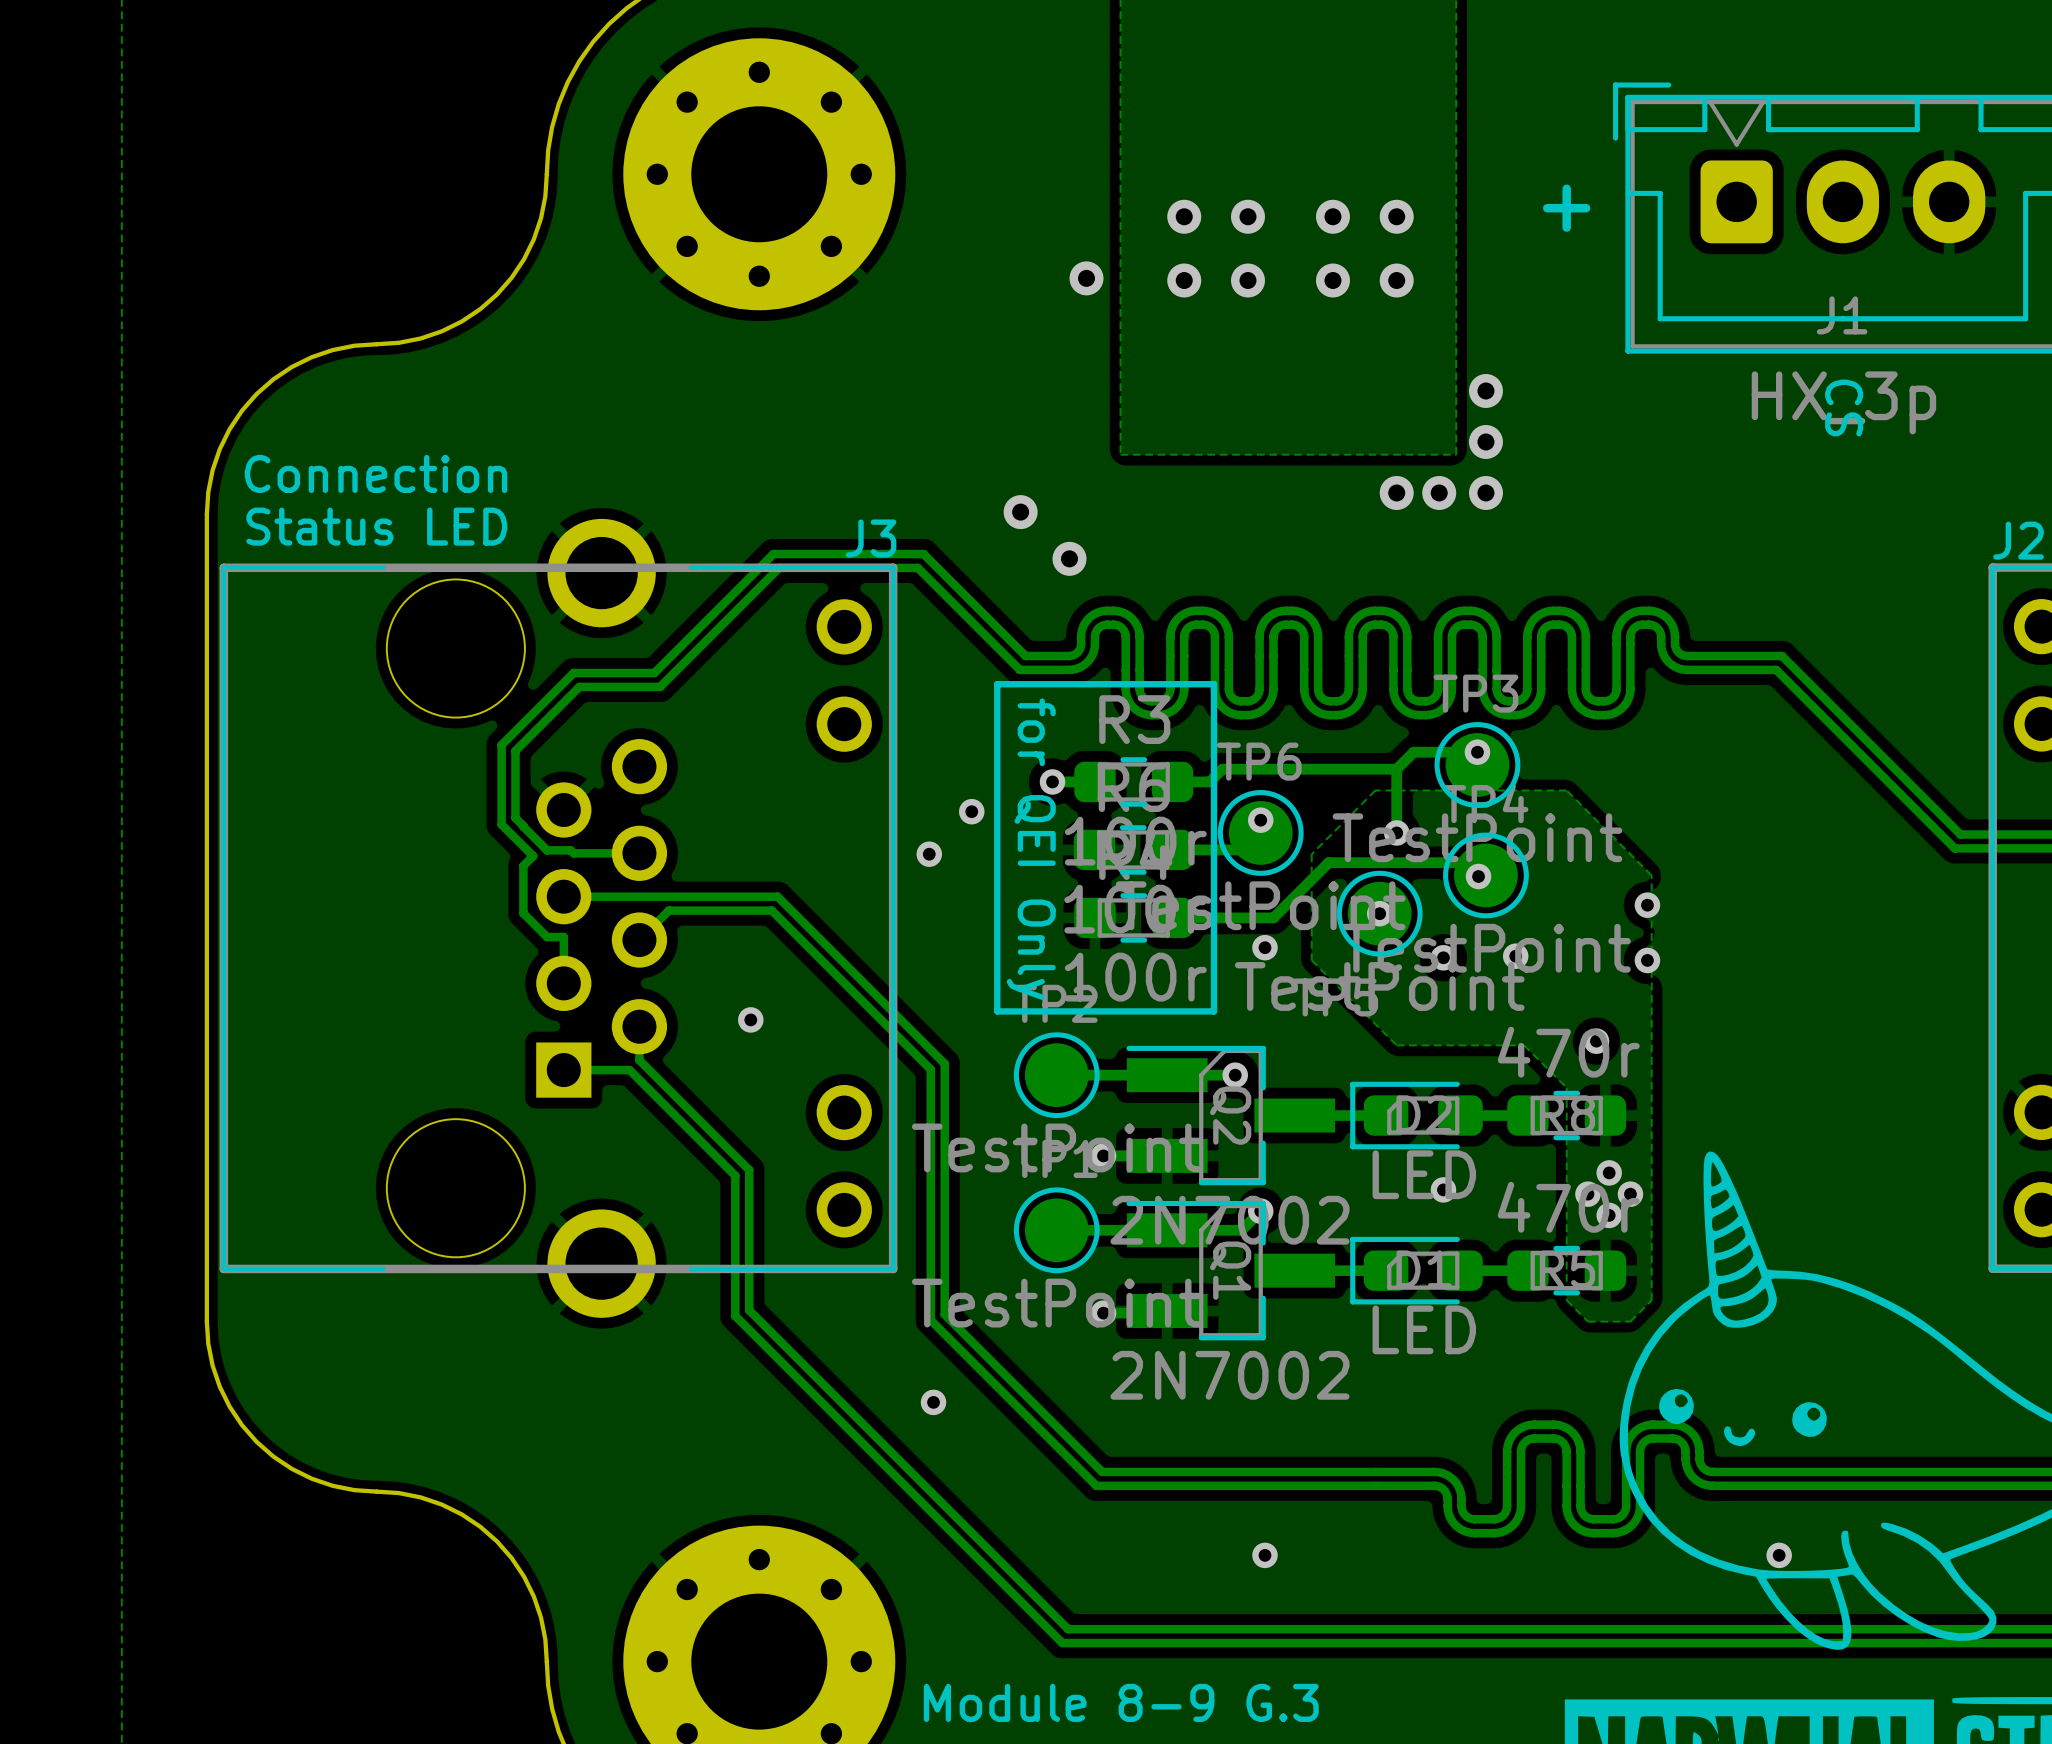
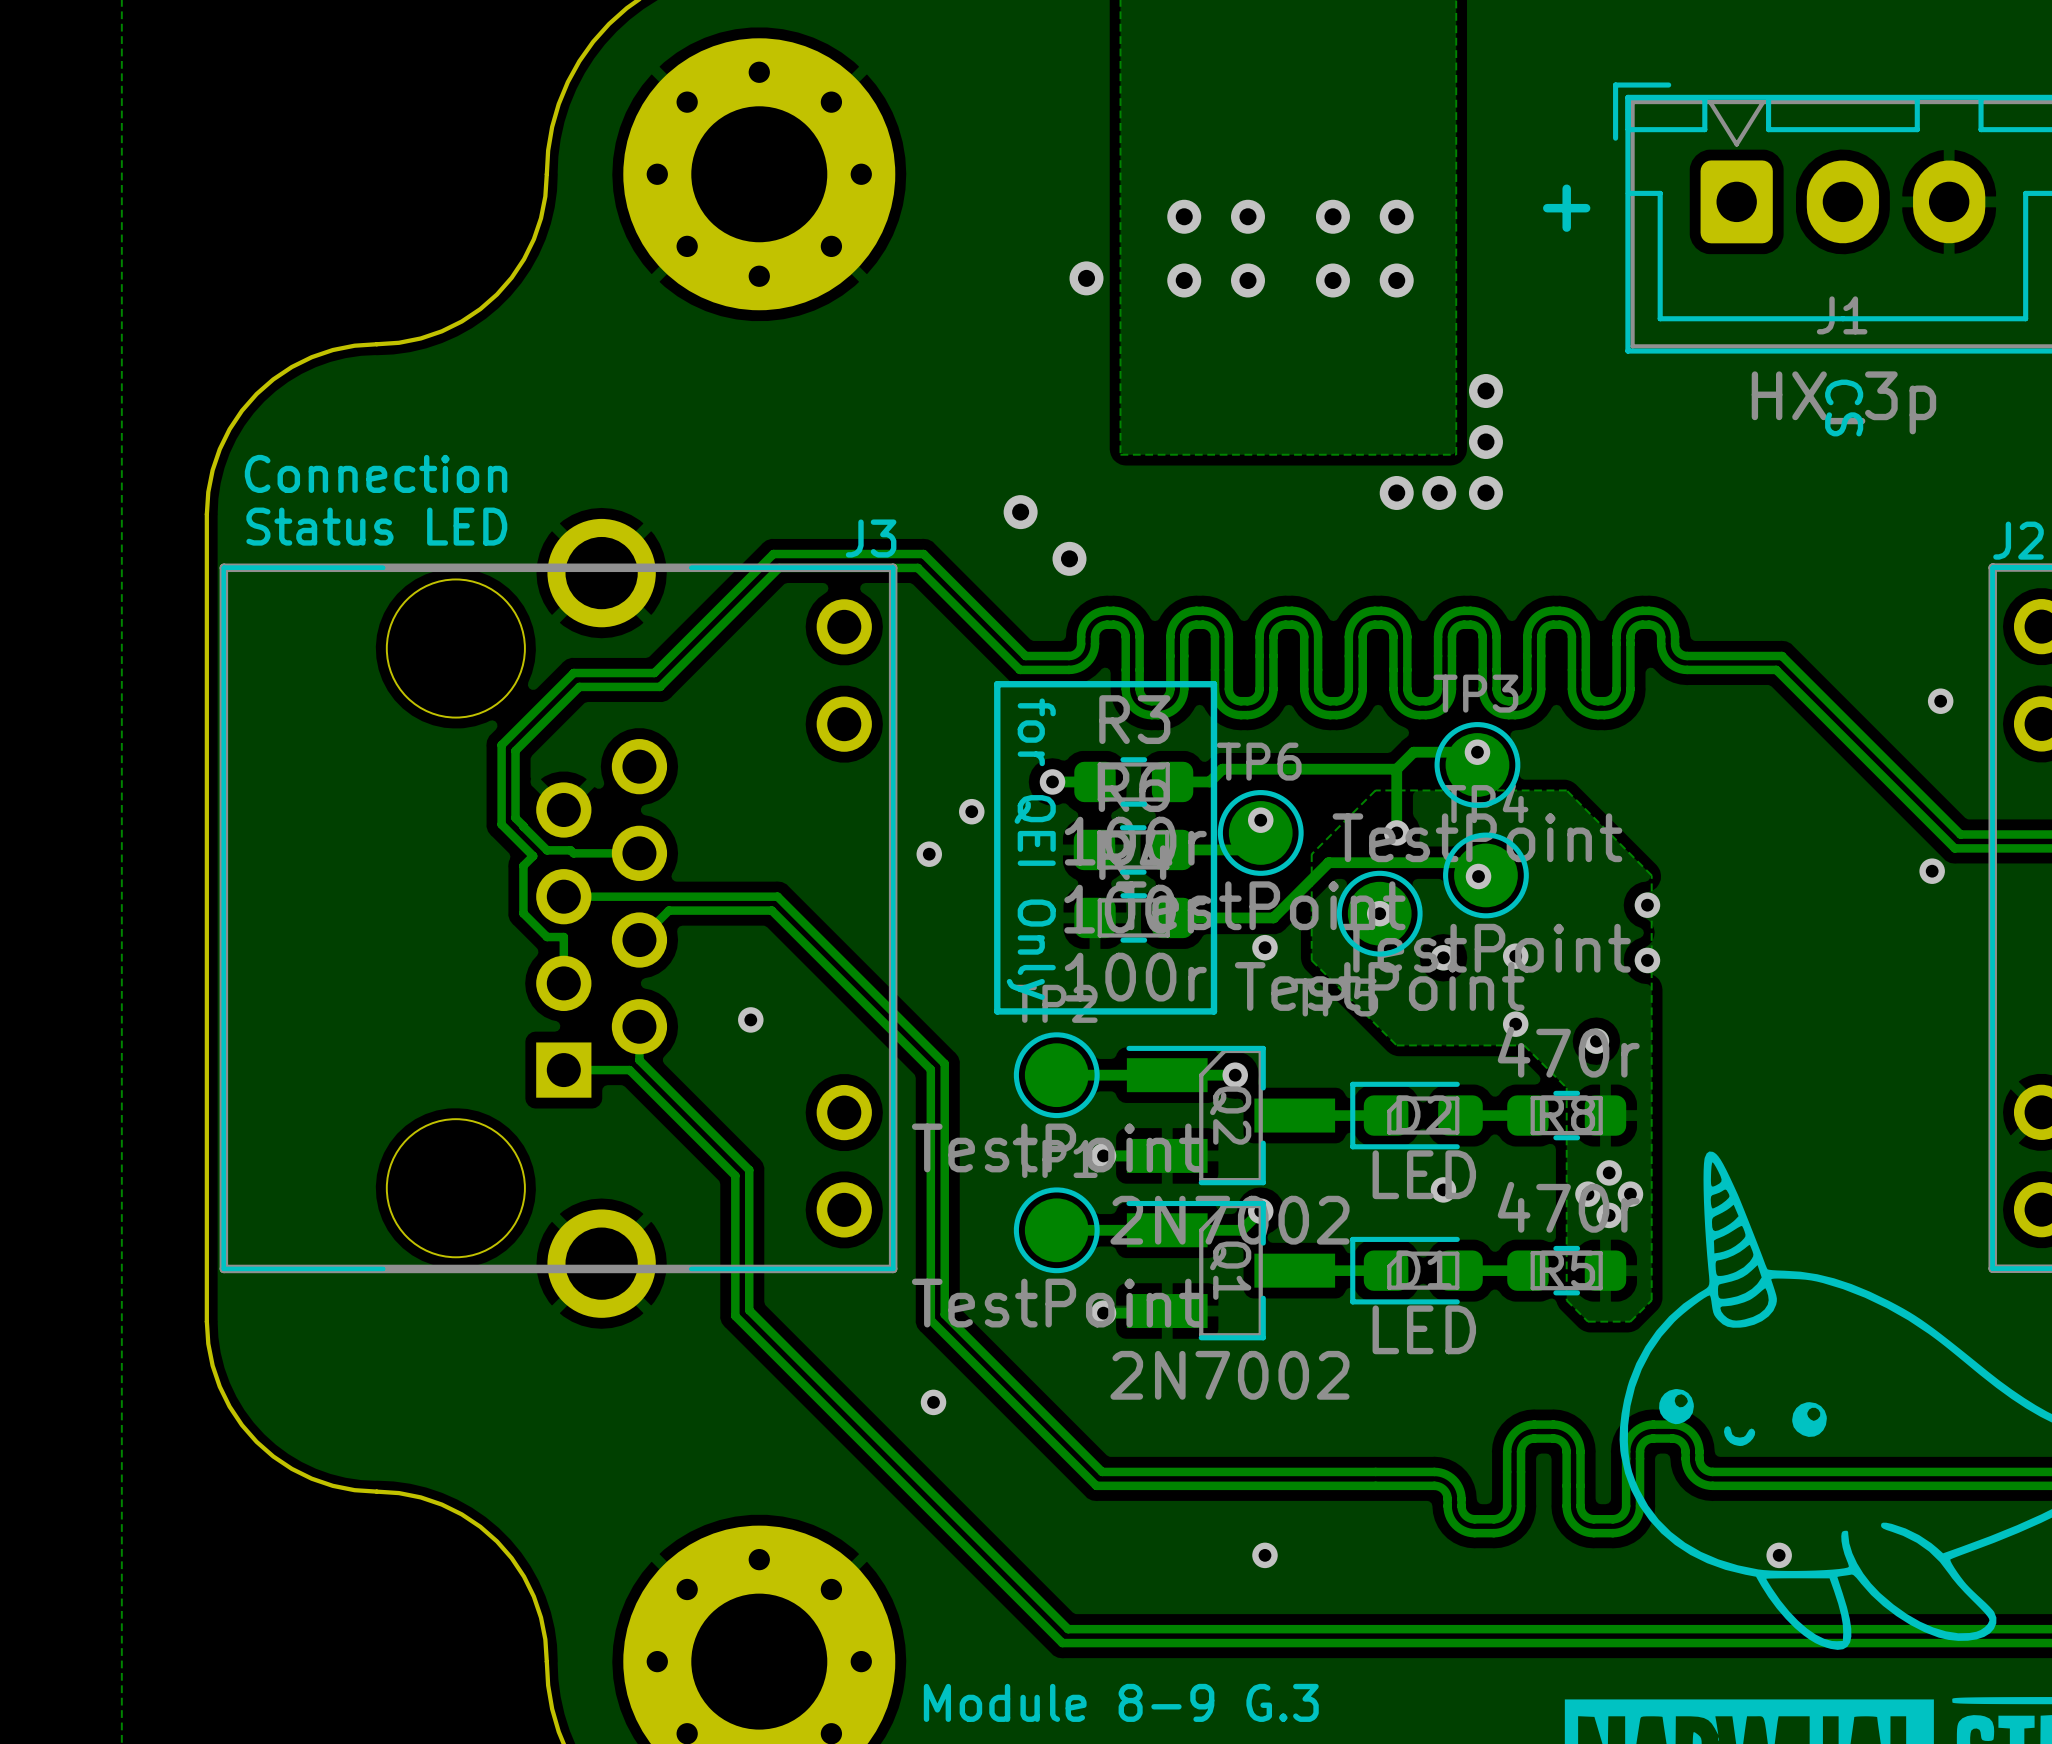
via: none -> (1940, 701)
via: none -> (1932, 871)
via: none -> (1515, 1024)

